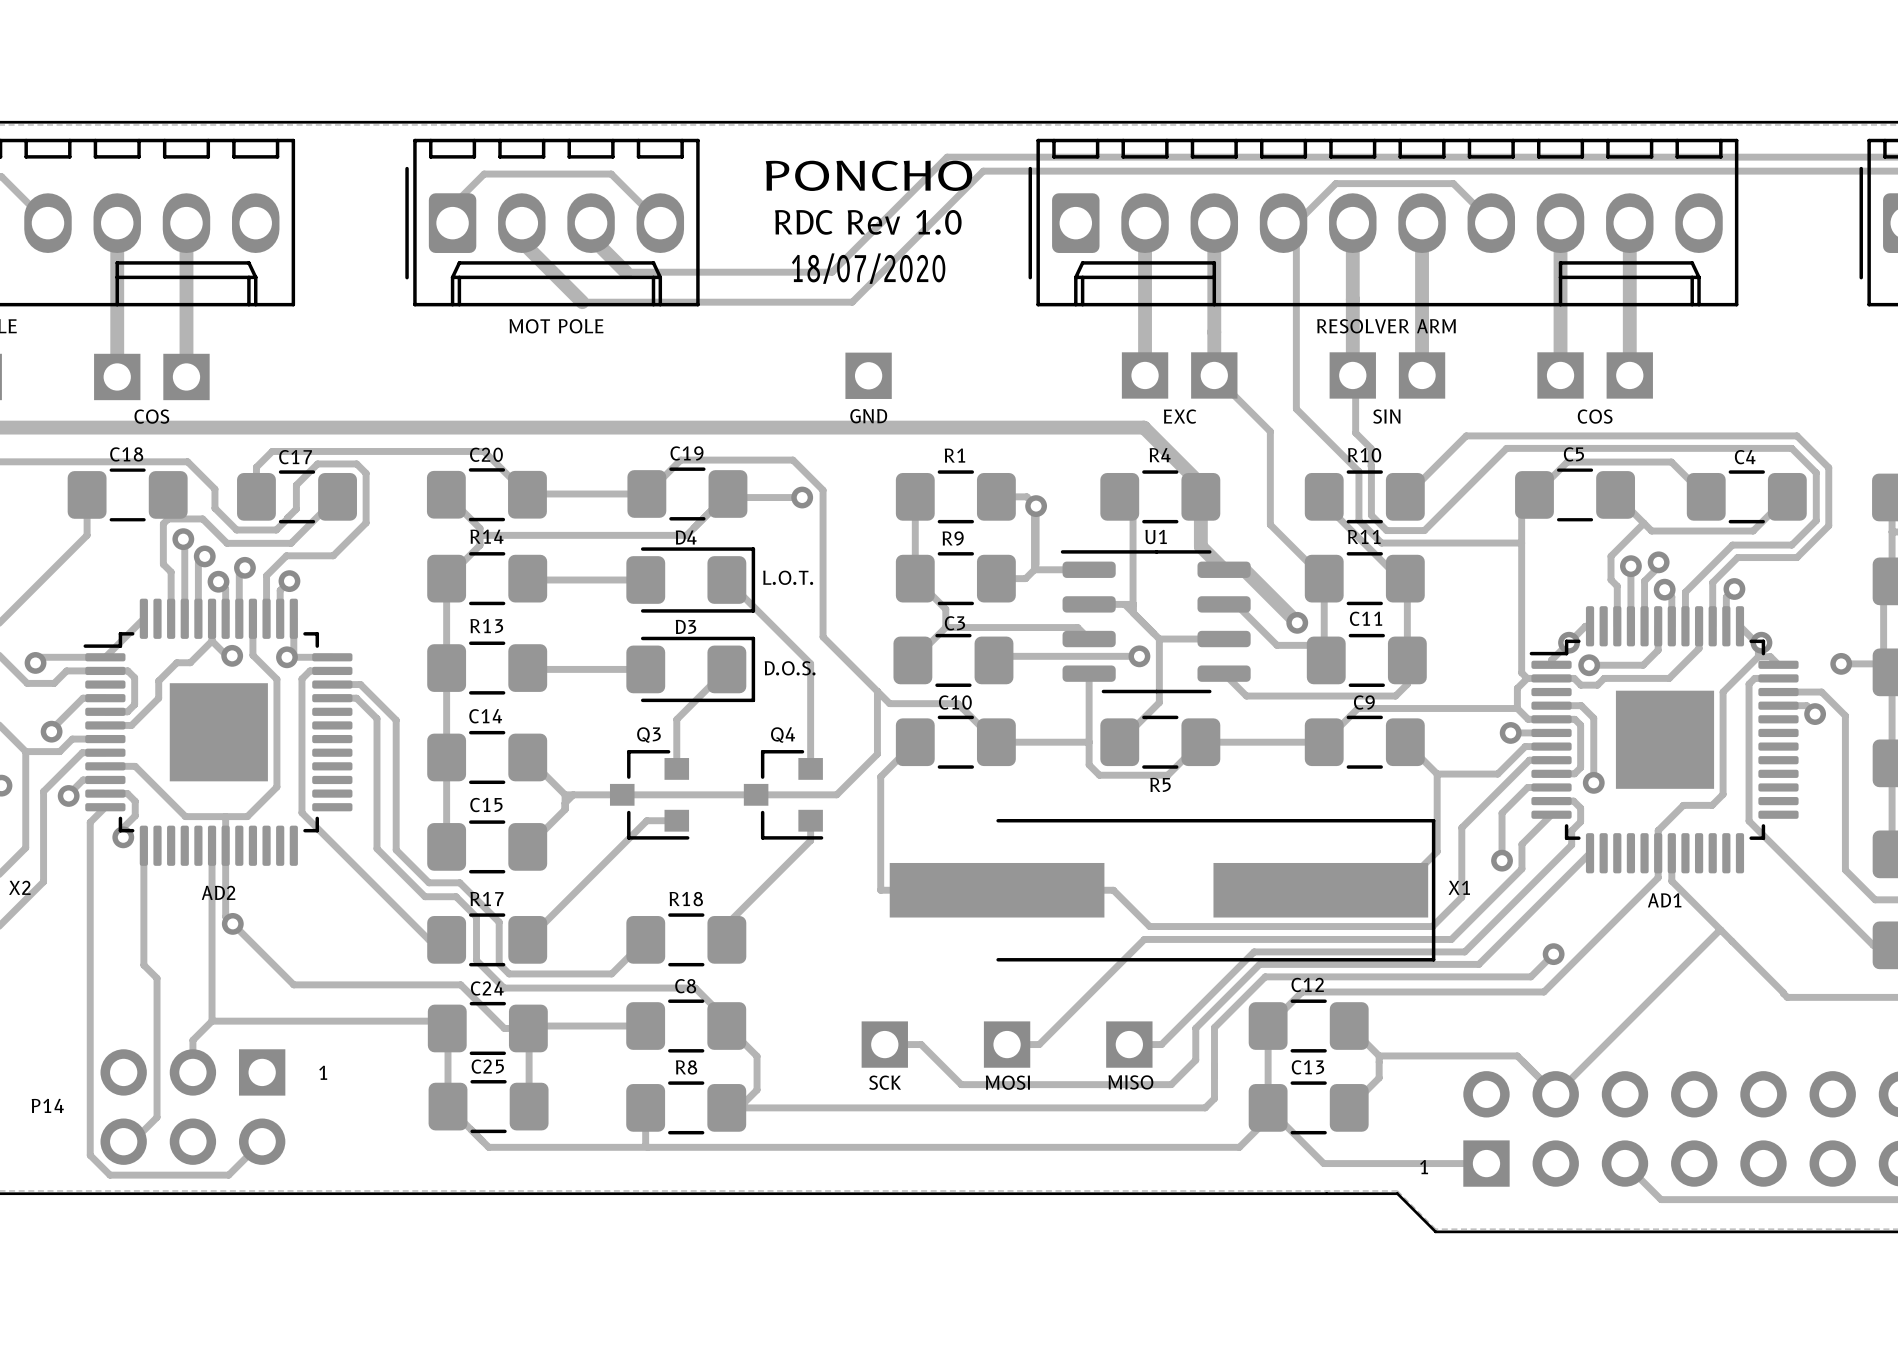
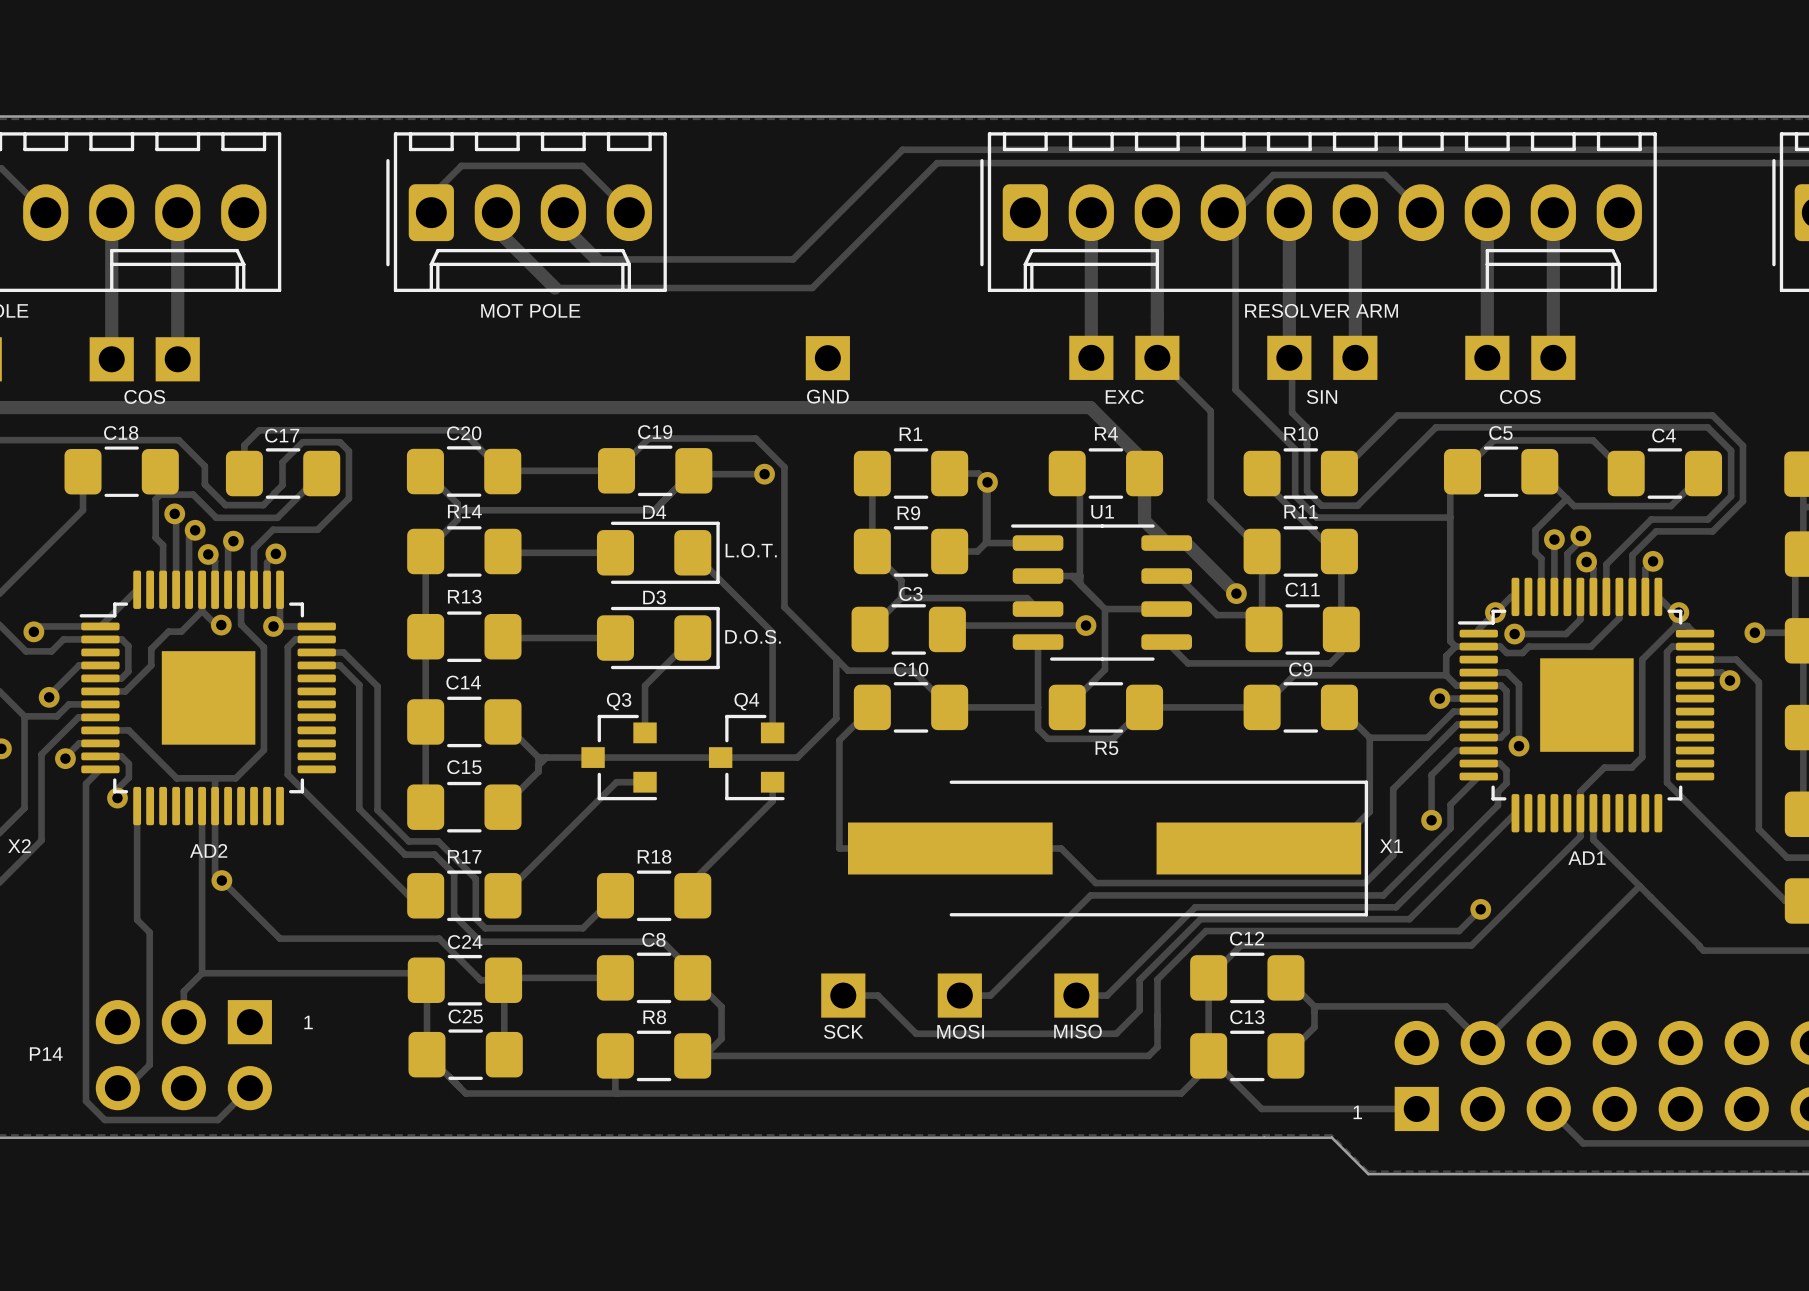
text: PONCHO (868, 175) -> none
text: RDC Rev 1.0 (868, 222) -> none
text: 18/07/2020 (868, 268) -> none

